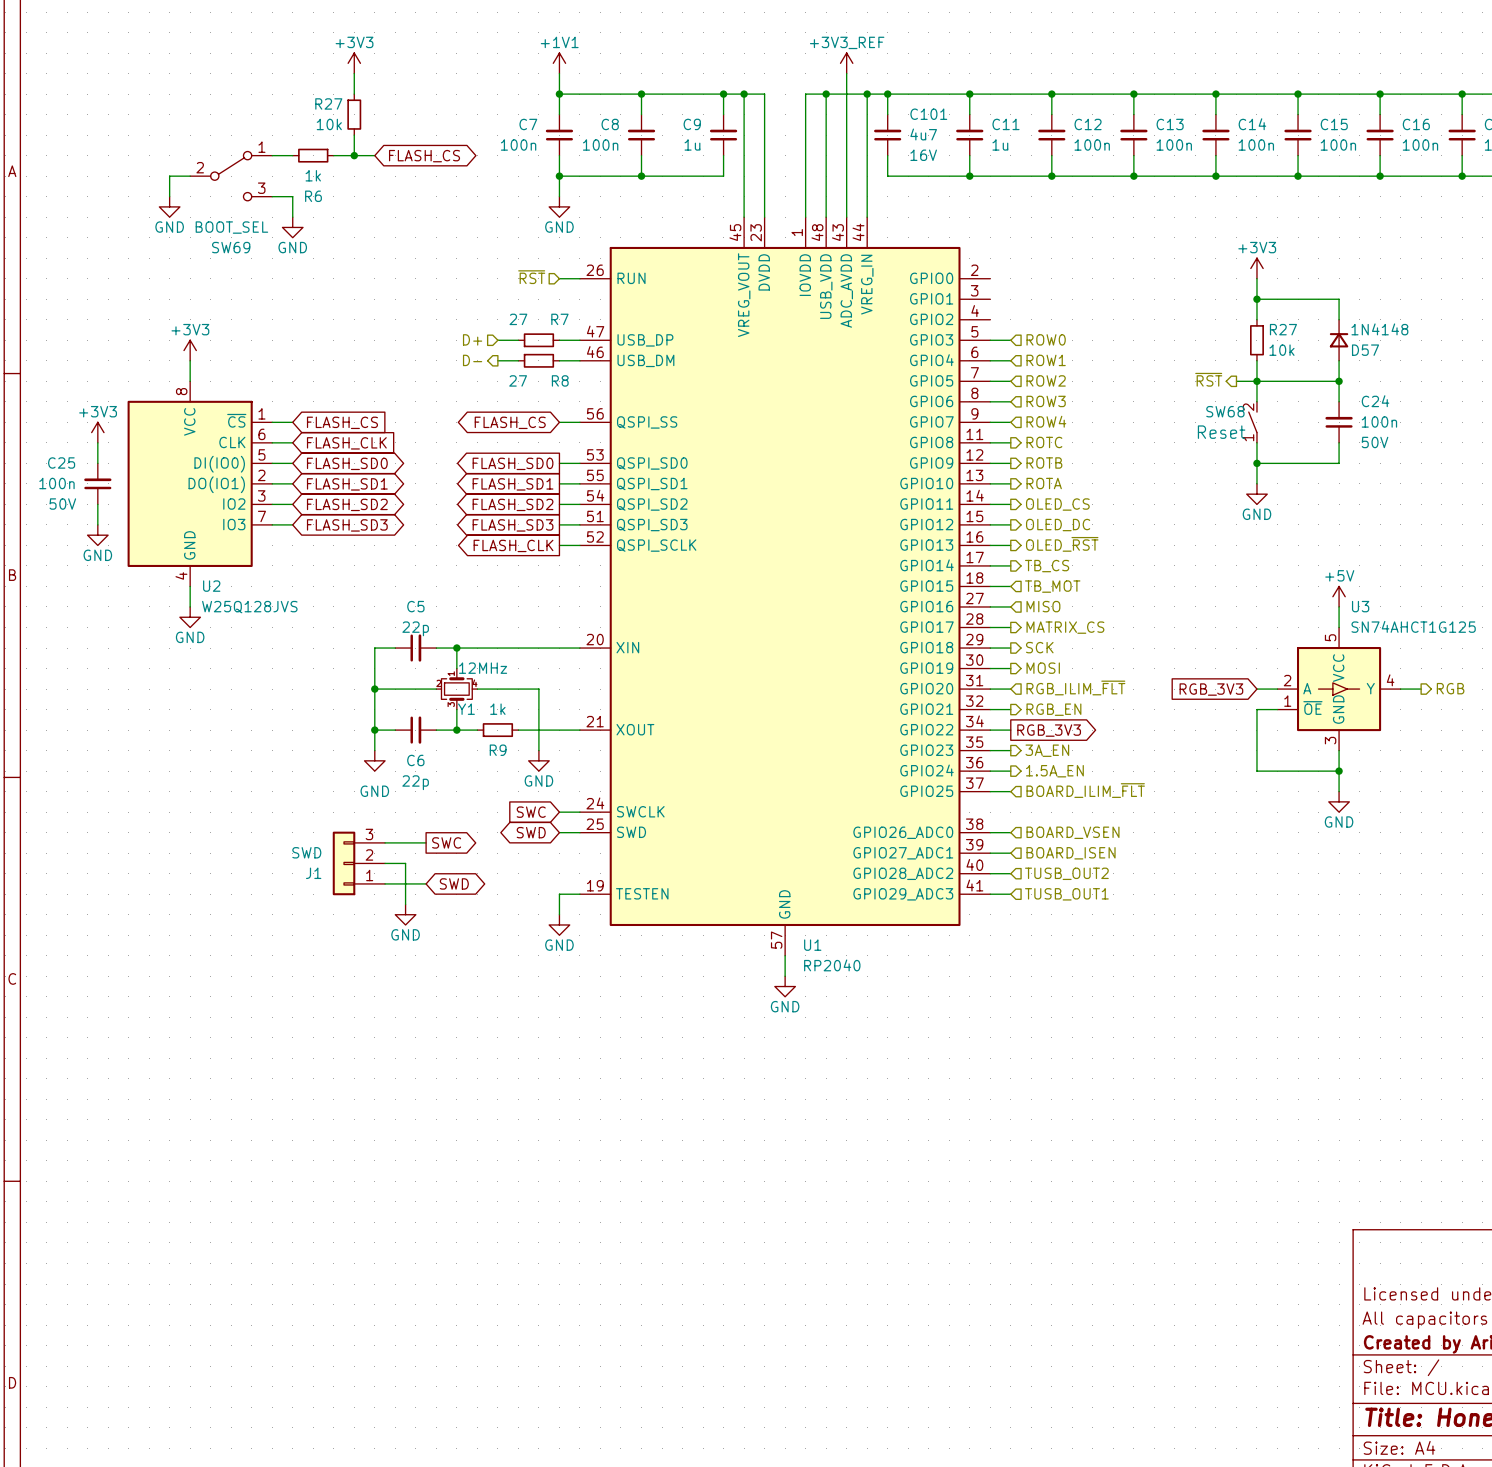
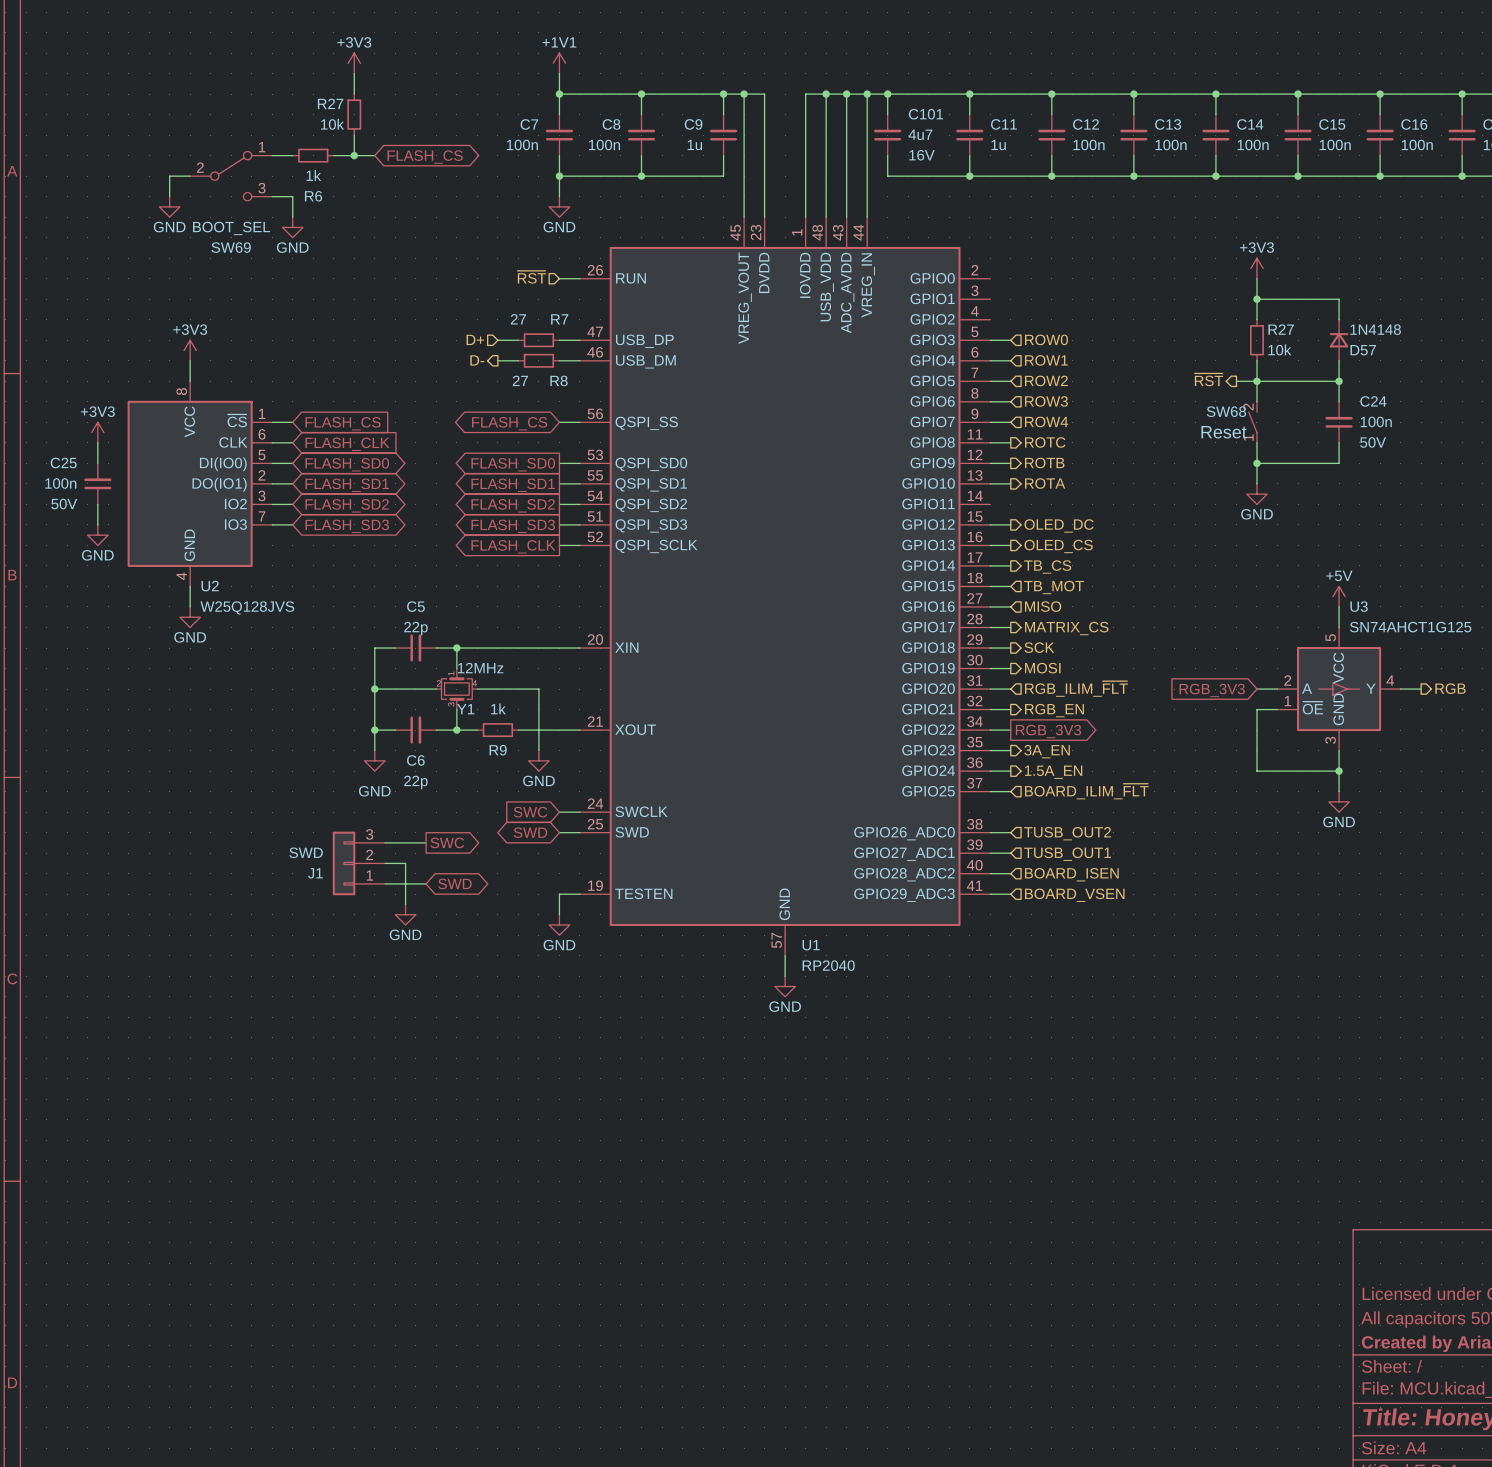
power symbol: +3V3_REF (846, 63) -> none
wire: (846, 73) (846, 94) -> none
junction: none -> (846, 94)
wire: (990, 504) (1010, 504) -> none
hierarchical label: OLED_CS (1057, 504) -> none
hierarchical label: OLED_~{RST} (1062, 544) -> OLED_CS (1058, 546)
hierarchical label: BOARD_VSEN (1072, 832) -> TUSB_OUT2 (1067, 833)
hierarchical label: BOARD_ISEN (1071, 853) -> TUSB_OUT1 (1067, 854)
hierarchical label: TUSB_OUT2 (1066, 873) -> BOARD_ISEN (1071, 874)
hierarchical label: TUSB_OUT1 (1066, 894) -> BOARD_VSEN (1074, 895)

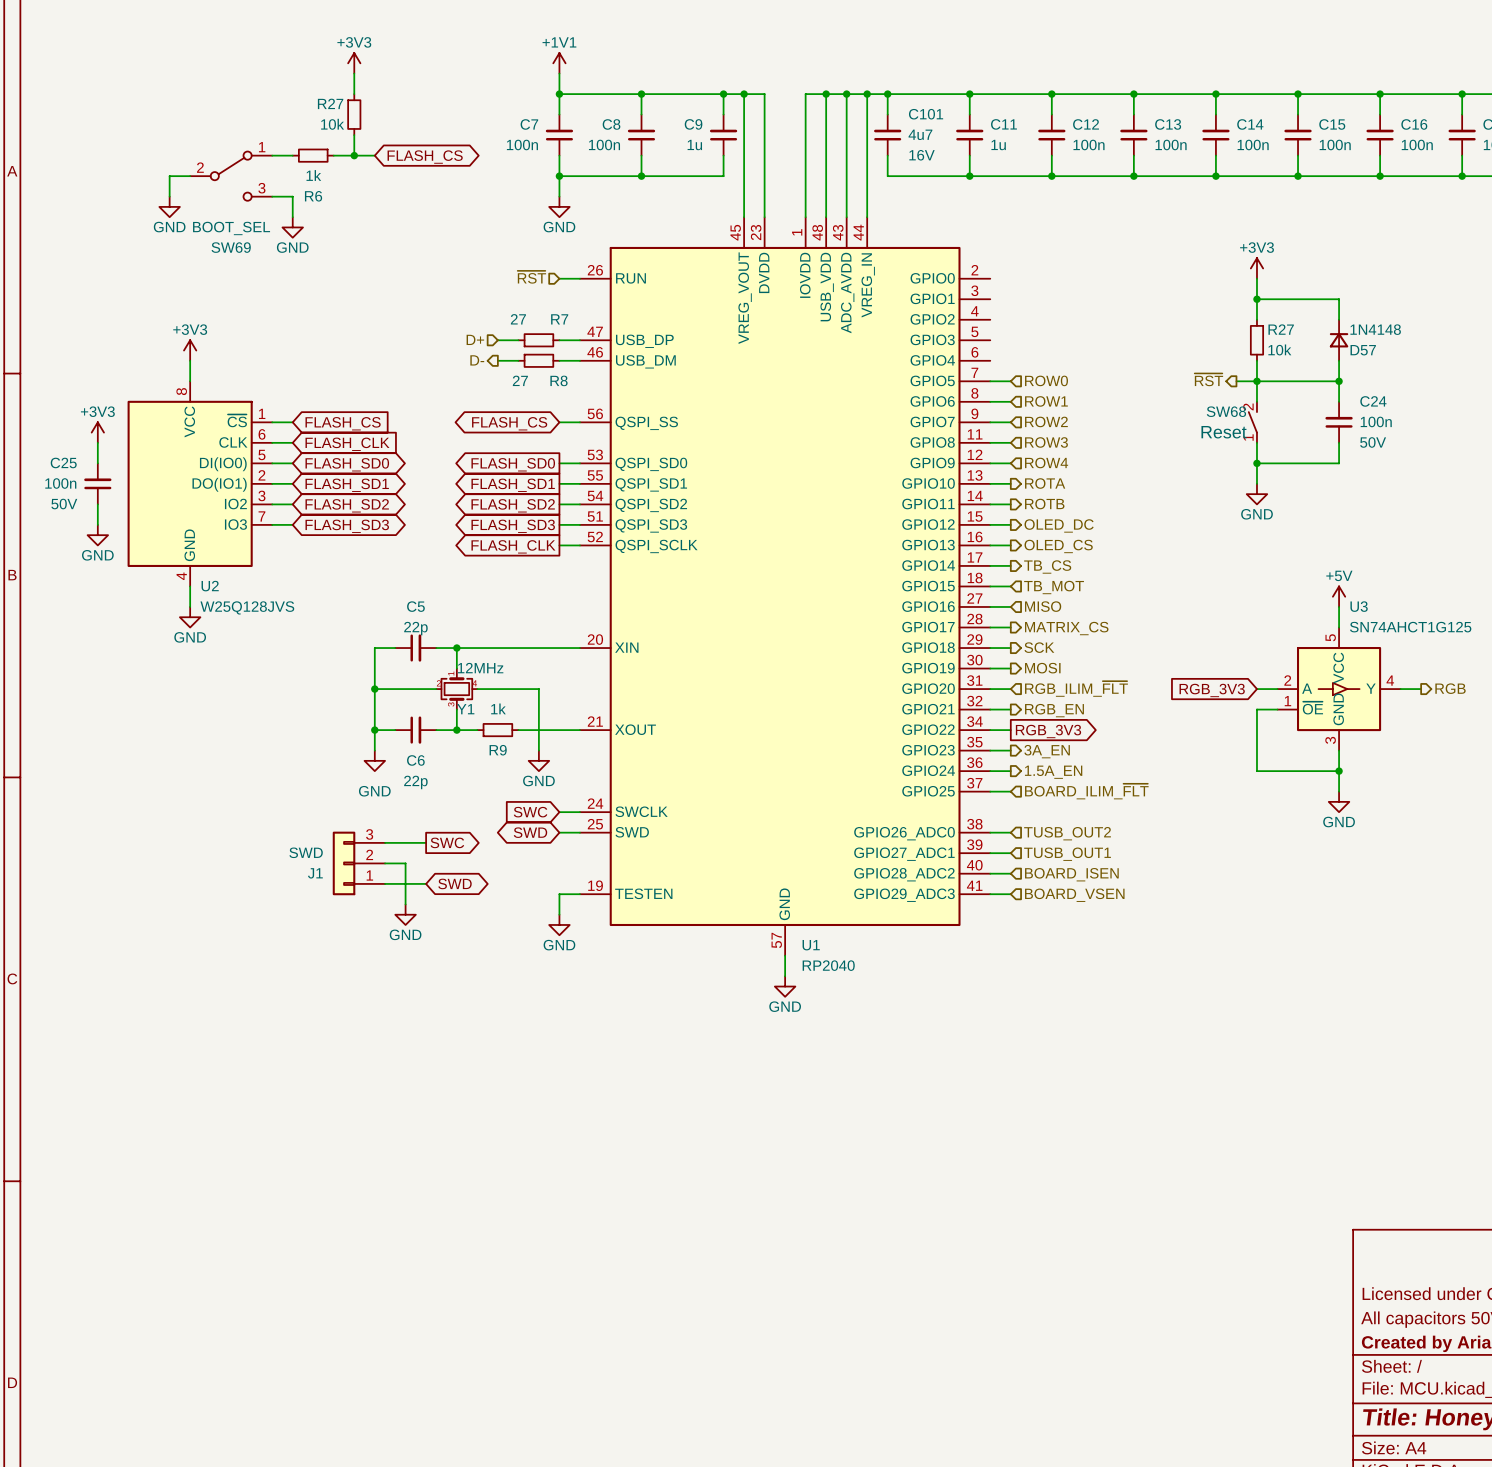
hierarchical label: ROW0 (1046, 339) -> none
wire: (990, 340) (1010, 340) -> none
wire: (990, 360) (1010, 360) -> (990, 504) (1010, 504)
hierarchical label: ROW1 (1046, 360) -> none
hierarchical label: ROW2 (1046, 380) -> ROW0 (1046, 380)
hierarchical label: ROW3 (1046, 401) -> ROW1 (1046, 401)
hierarchical label: ROW4 (1046, 421) -> ROW2 (1046, 421)
hierarchical label shape: output (1045, 442) -> input (1046, 442)
hierarchical label: ROTC (1045, 442) -> ROW3 (1046, 442)
hierarchical label shape: output (1044, 462) -> input (1046, 462)
hierarchical label: ROTB (1044, 462) -> ROW4 (1046, 462)
hierarchical label: none -> ROTB (1044, 504)

